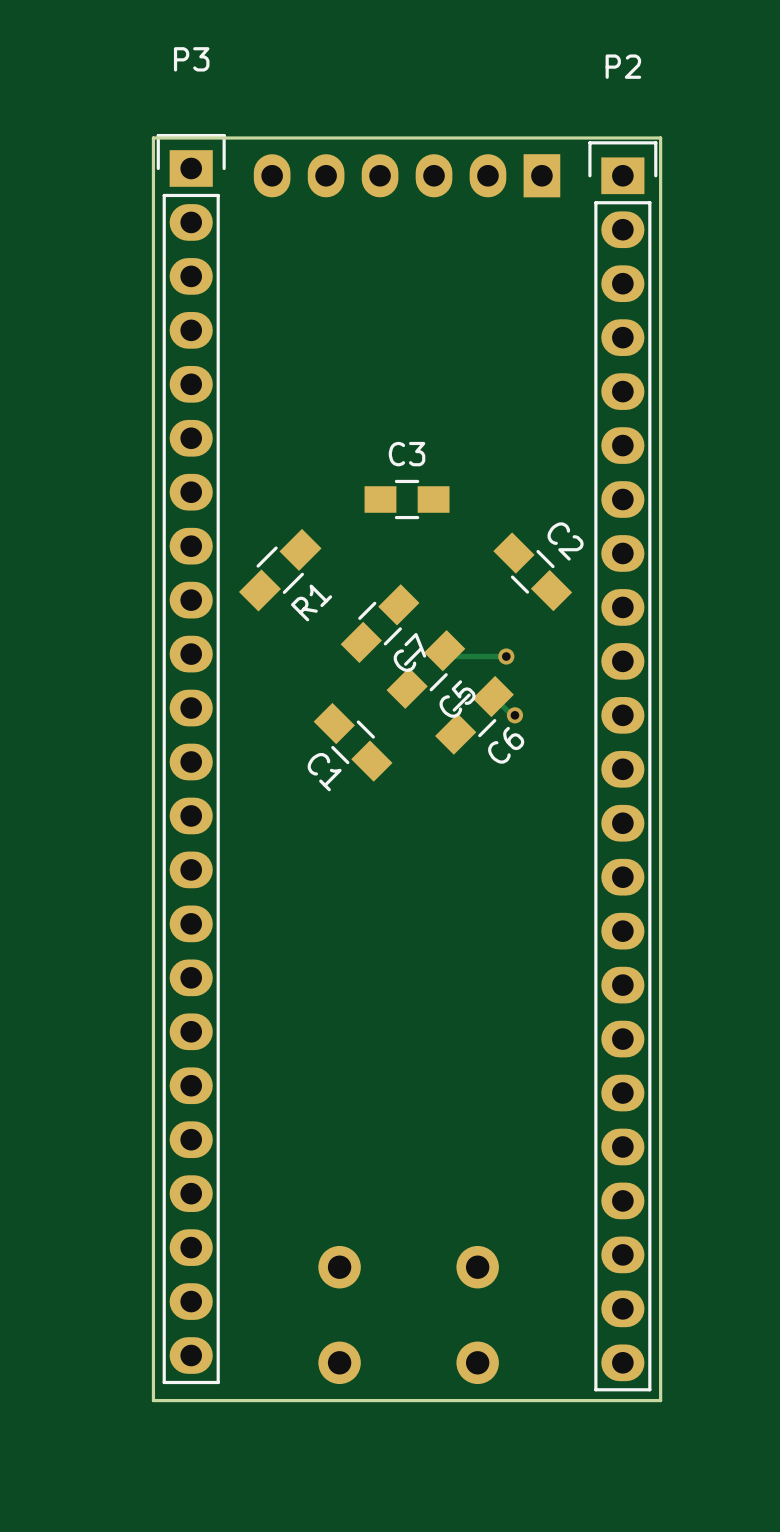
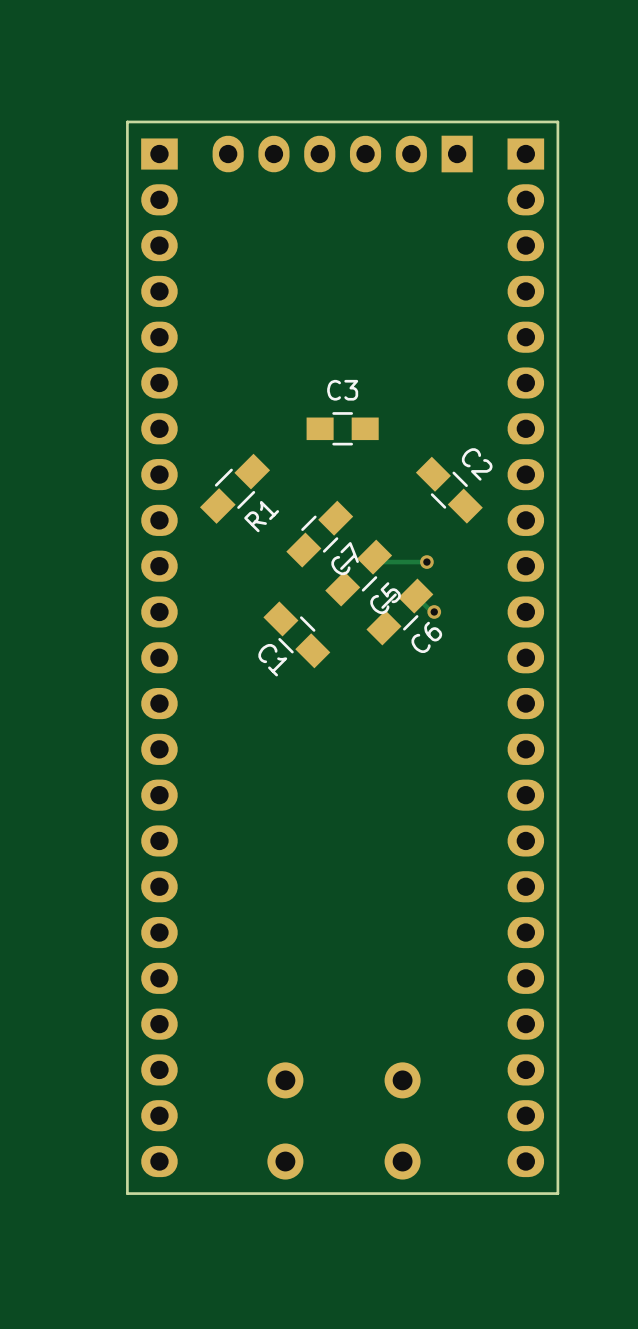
P3 side: bottom (191, 759) -> top (159, 657)
P2 side: bottom (622, 766) -> top (525, 657)

